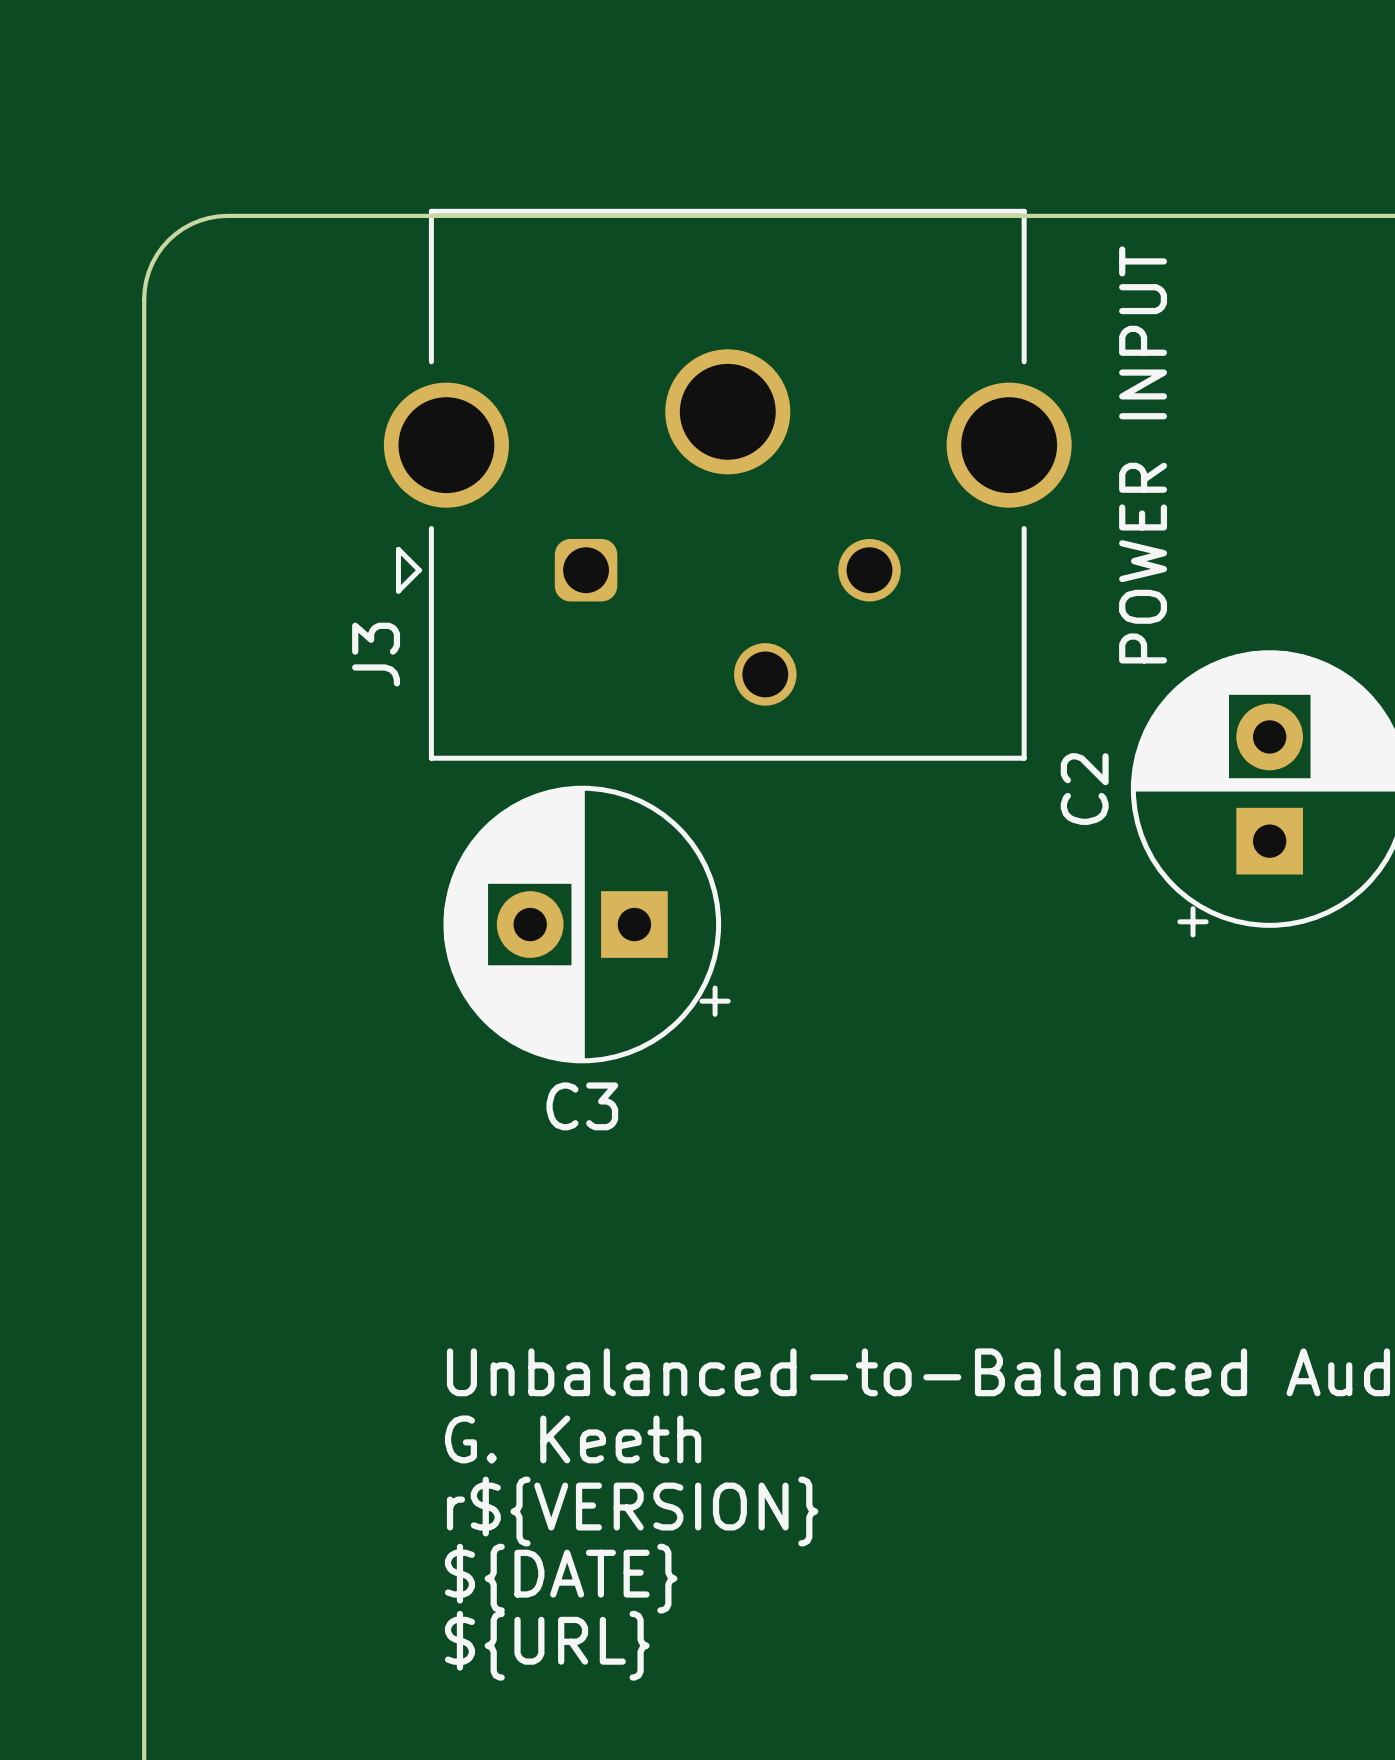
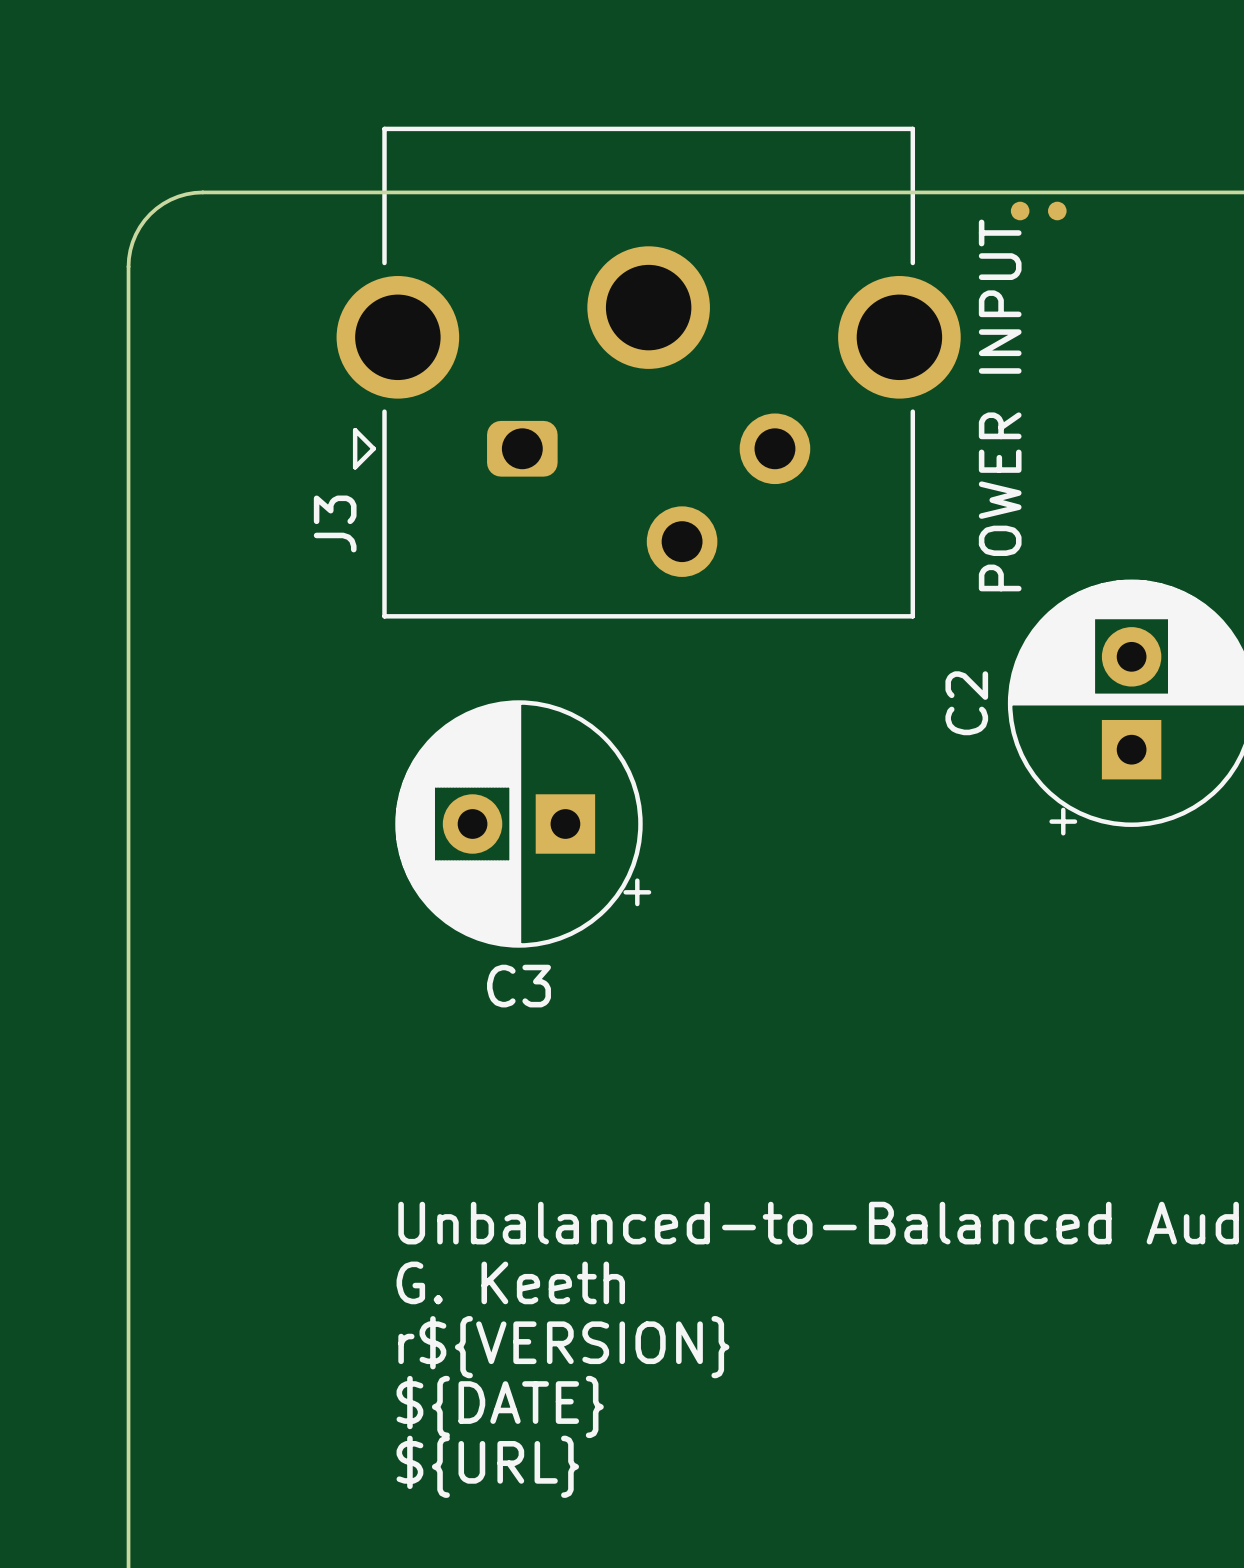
J3 footprint: [383, 208, 1072, 761] -> [336, 126, 961, 619]
part: none -> (1038, 211)

